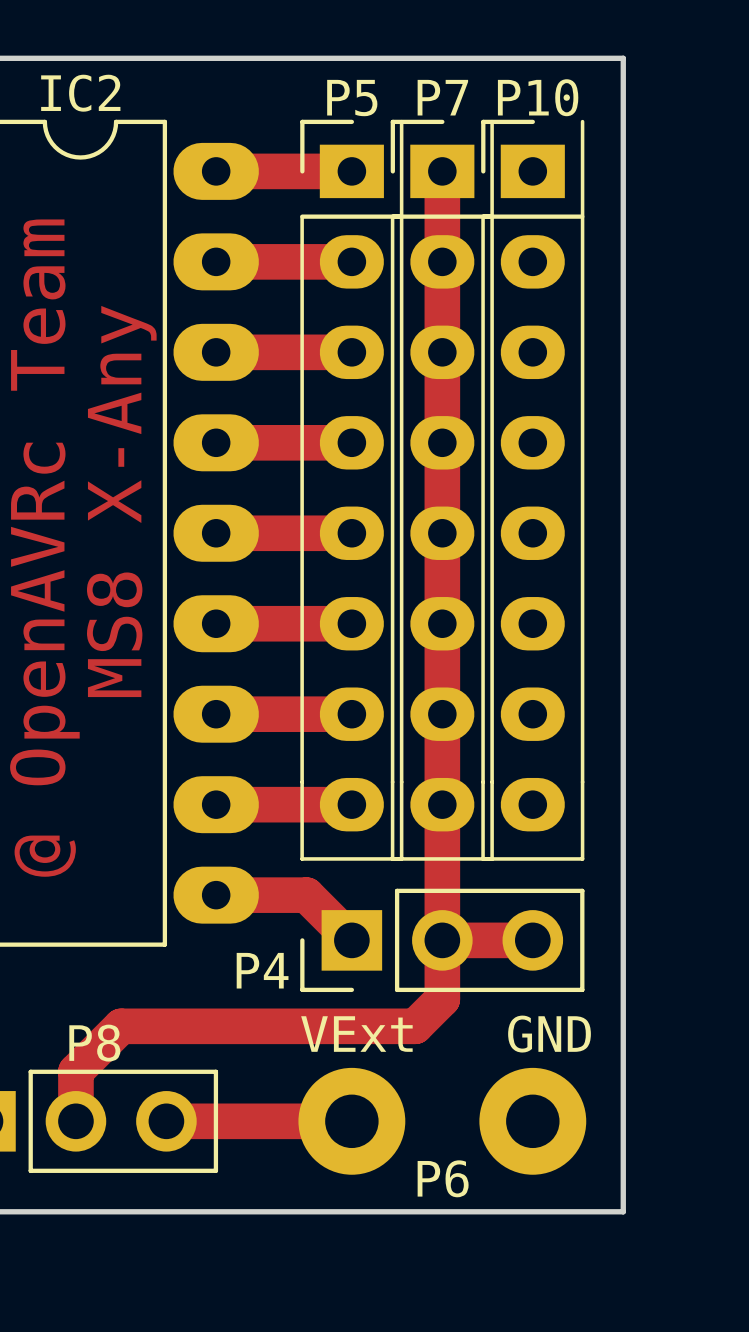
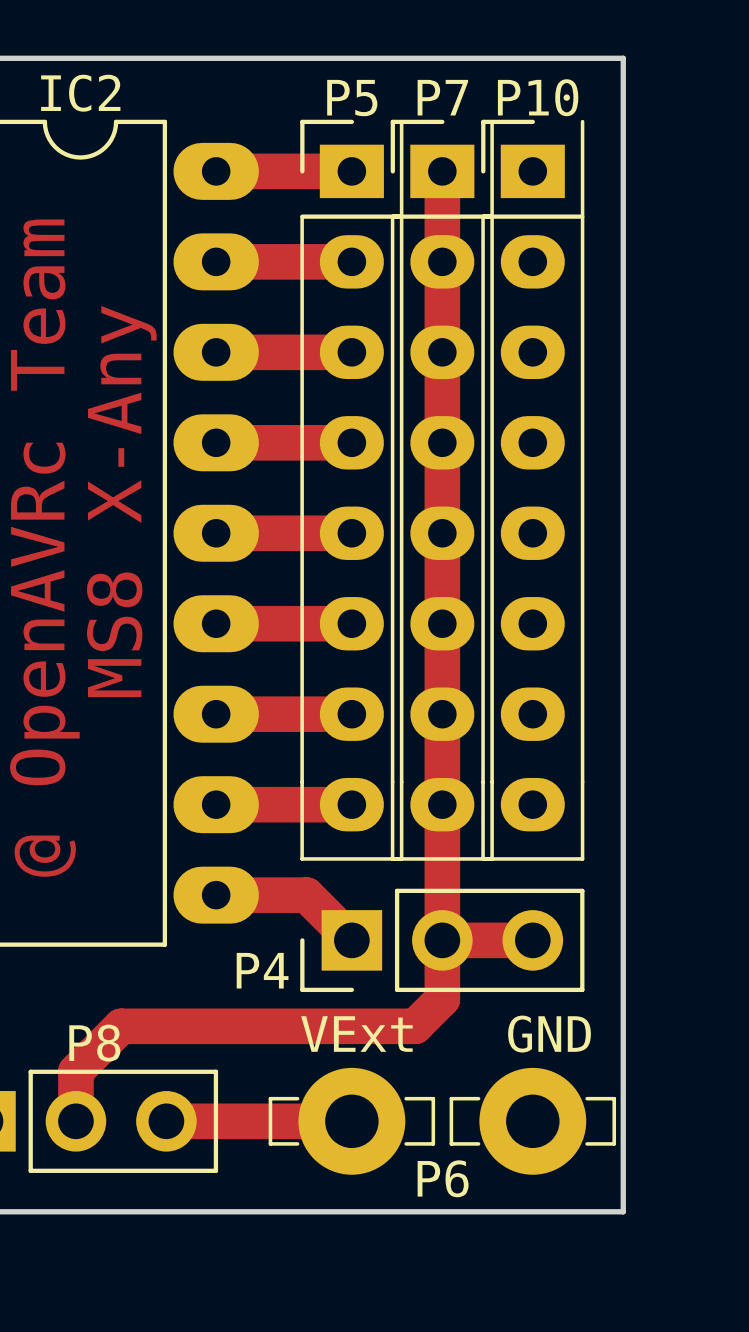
P6 footprint: [298, 1067, 587, 1175] -> [268, 1067, 617, 1175]

